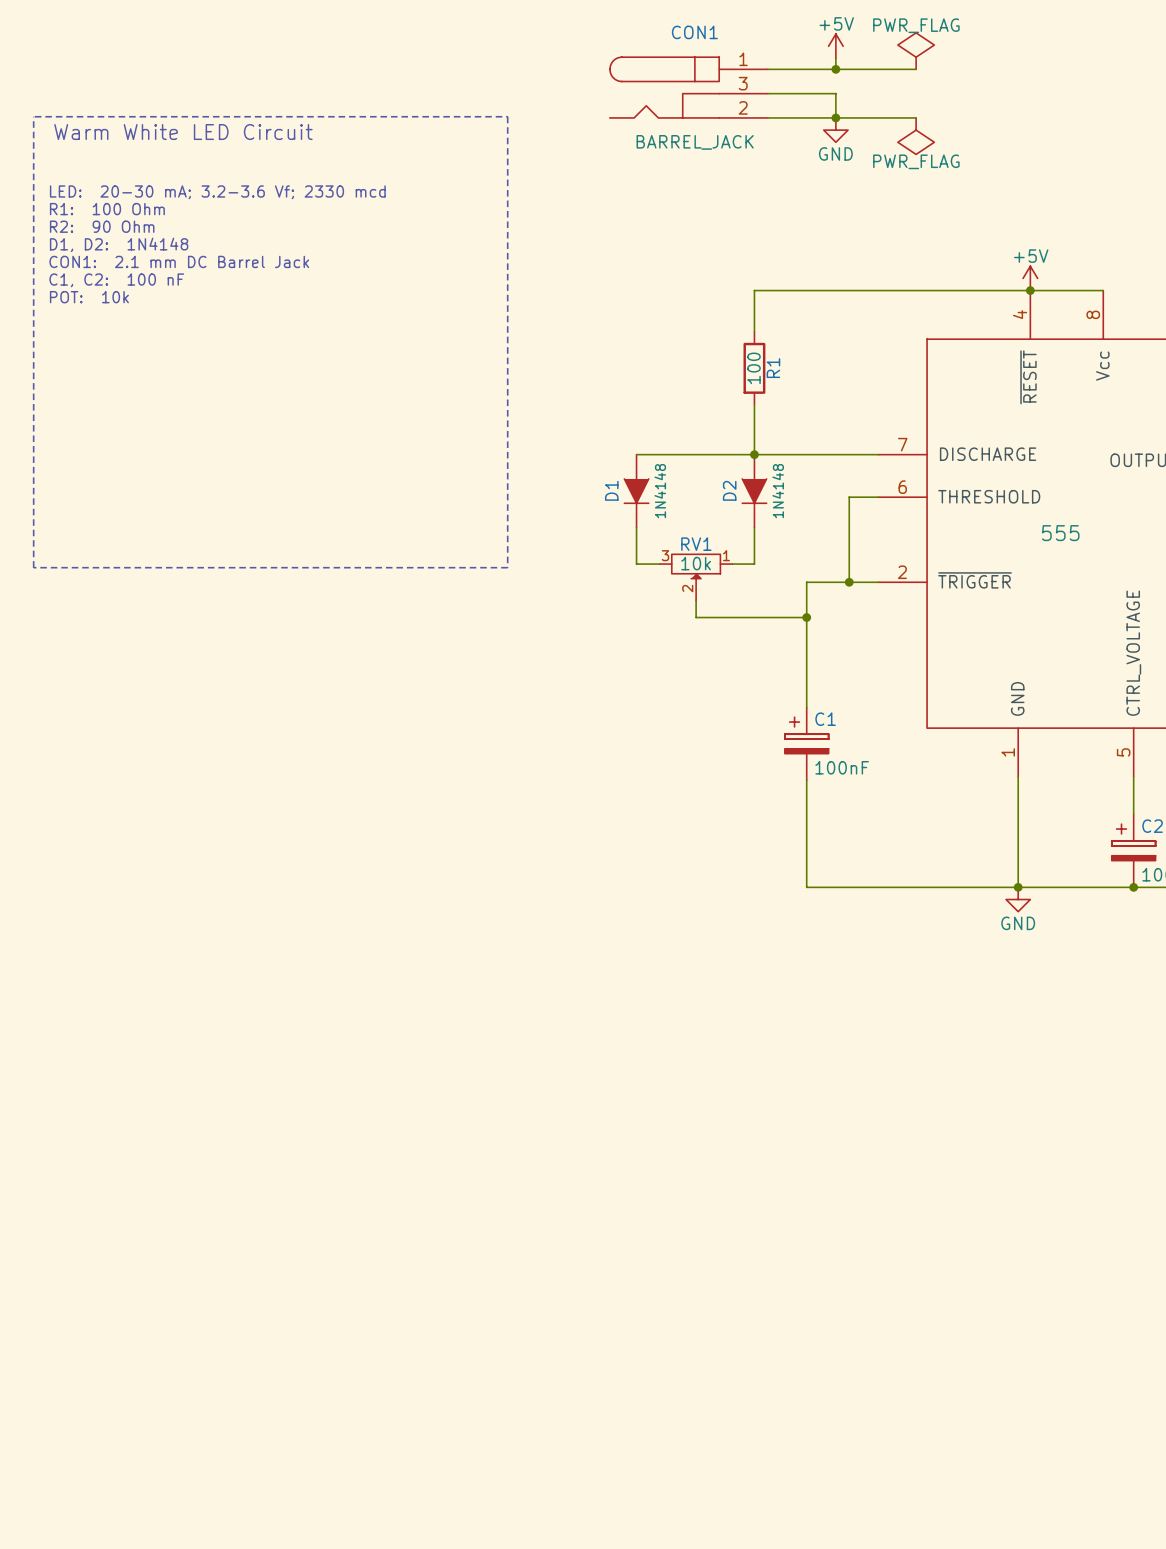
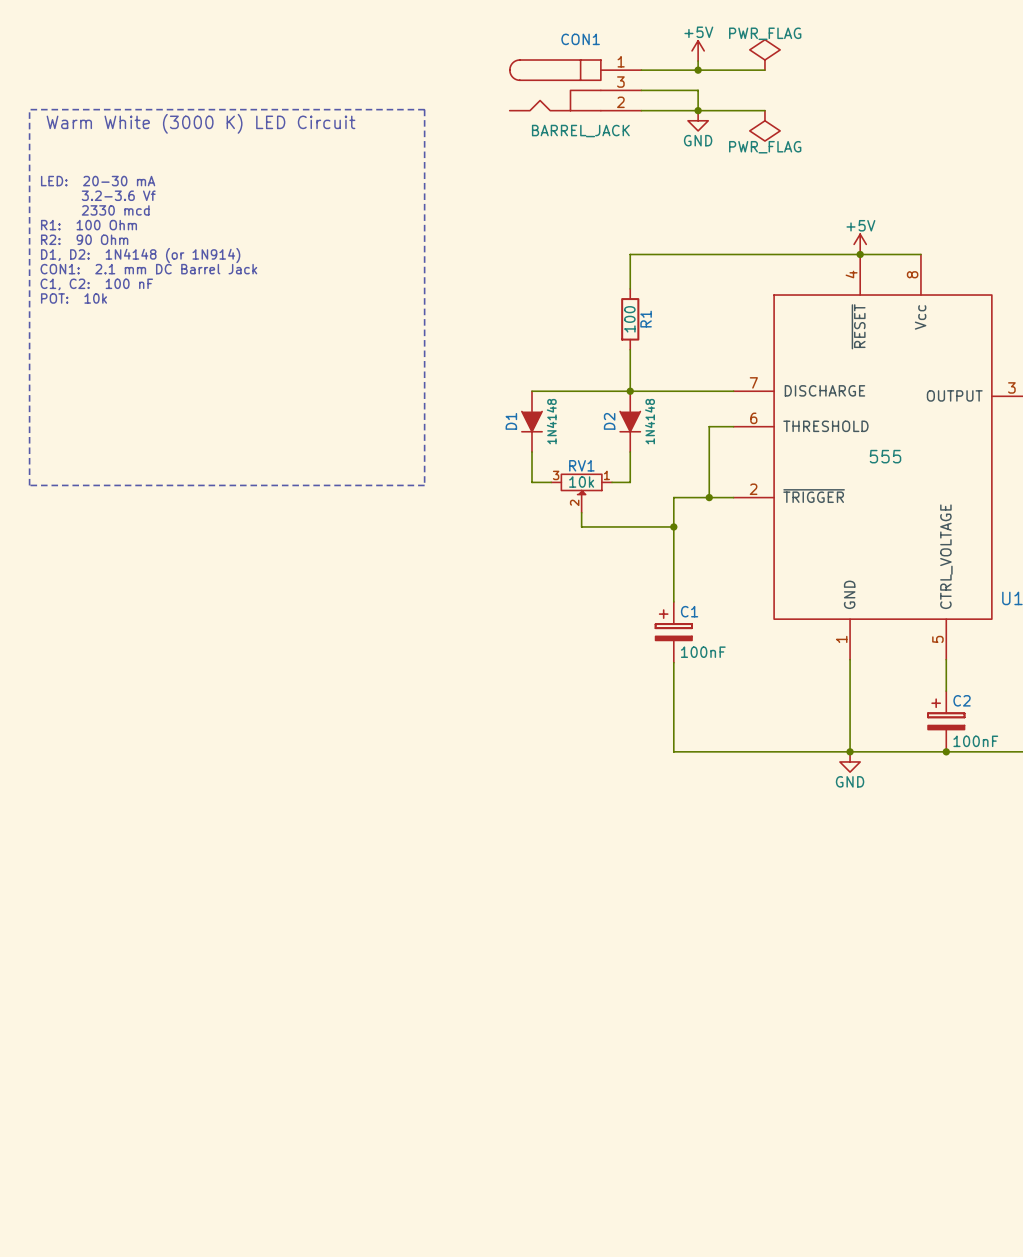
text: Warm White LED Circuit (183, 132) -> Warm White (3000 K) LED Circuit (200, 123)
text: LED: 20-30 mA; 3.2-3.6 Vf; 2330 mcd (217, 192) -> none
text: none -> LED: 20-30 mA (98, 181)
text position: R1: 100 Ohm (107, 209) -> R1: 100 Ohm (88, 225)
text: none -> 3.2-3.6 Vf (118, 195)
text position: R2: 90 Ohm (102, 226) -> R2: 90 Ohm (84, 239)
text: none -> 2330 mcd (115, 210)
text: D1, D2: 1N4148 (119, 244) -> none
text position: CON1: 2.1 mm DC Barrel Jack (179, 261) -> CON1: 2.1 mm DC Barrel Jack (148, 269)
text position: C1, C2: 100 nF (116, 280) -> C1, C2: 100 nF (96, 284)
text: none -> D1, D2: 1N4148 (or 1N914) (140, 255)
text position: POT: 10k (89, 297) -> POT: 10k (74, 298)

